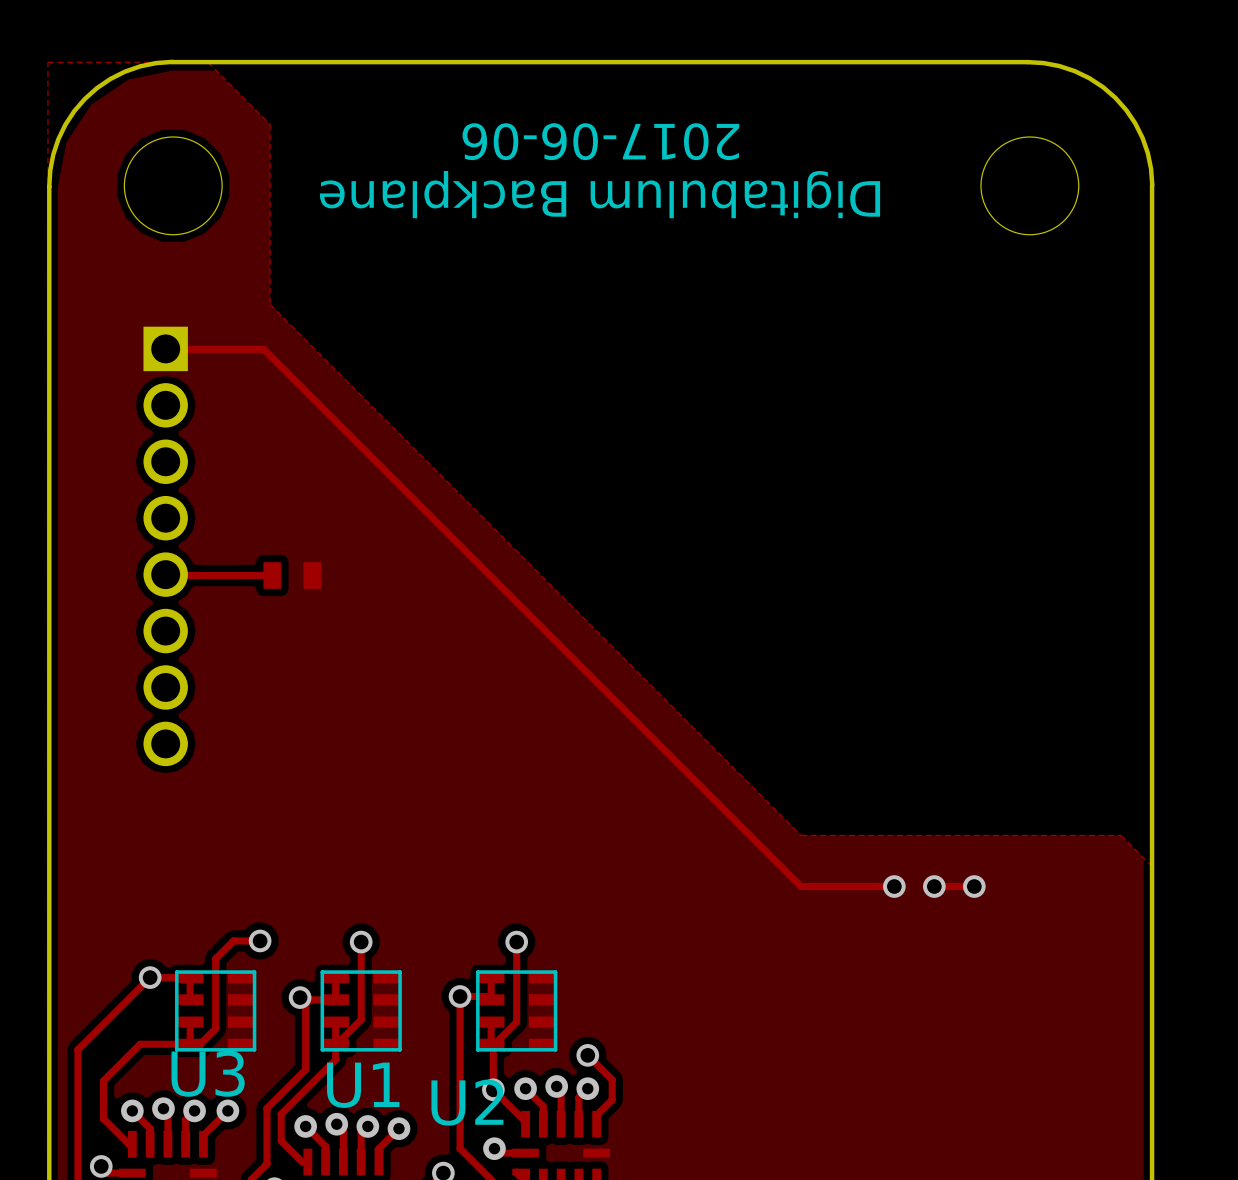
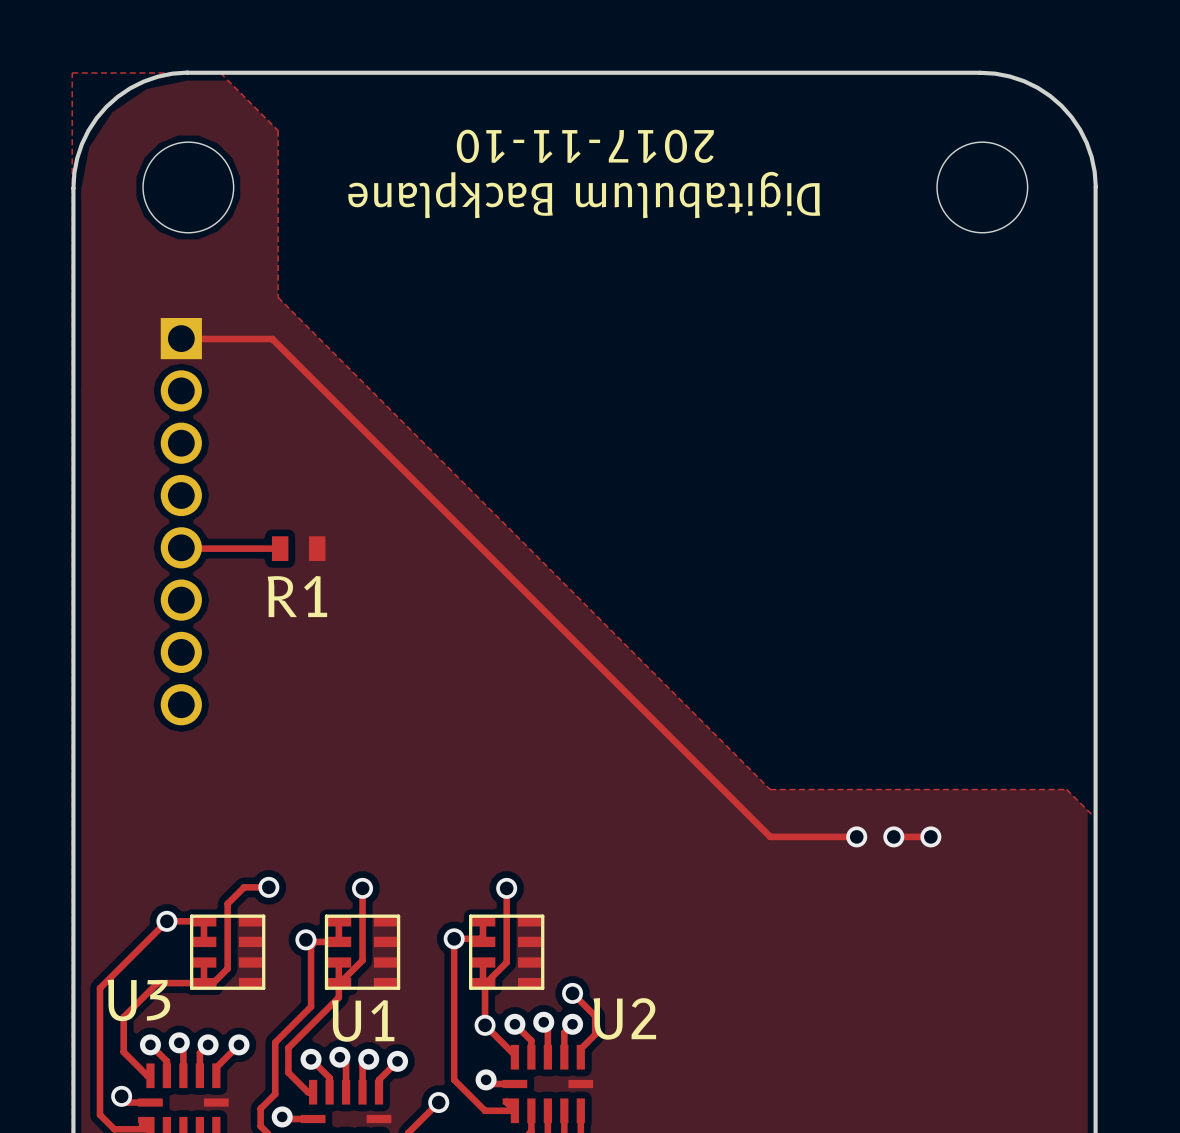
text: 2017-06-06 (600, 141) -> 2017-11-10 (585, 146)
R1 name: none -> R1 (297, 596)
U3 name position: U3 (208, 1073) -> U3 (138, 1000)
U2 name position: U2 (467, 1102) -> U2 (624, 1018)

